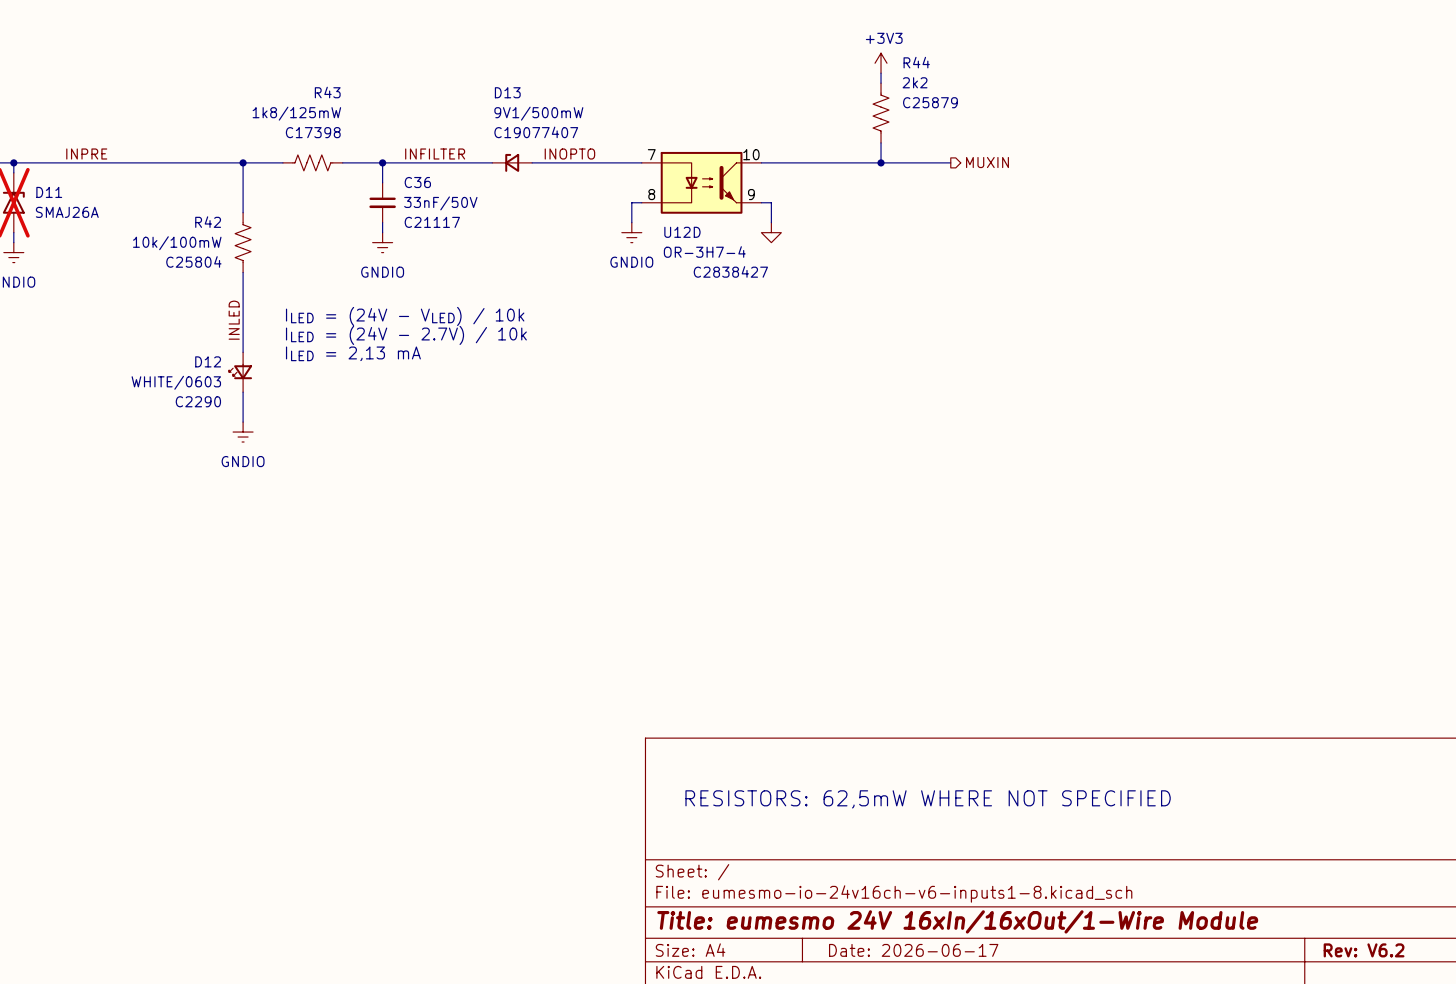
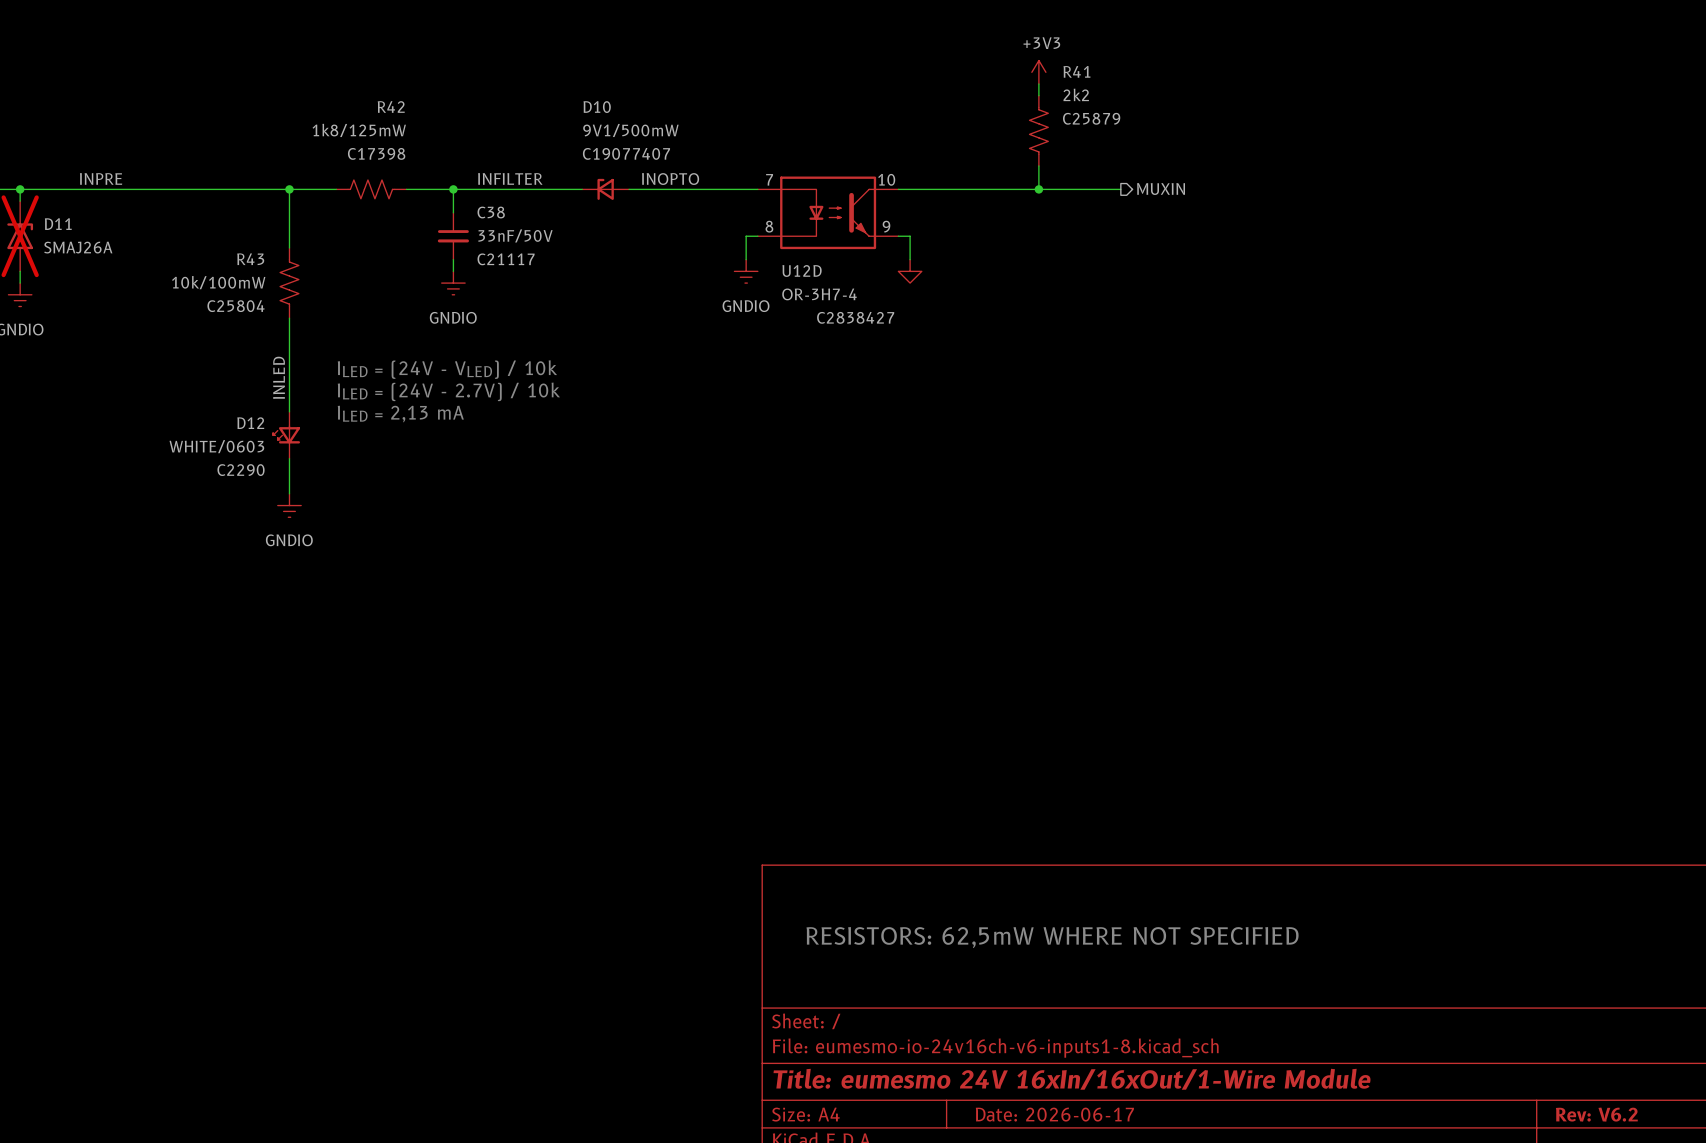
R44 name: R44 (916, 62) -> R41 (1076, 71)
R43 name: R43 (327, 92) -> R42 (391, 106)
D13 name: D13 (507, 92) -> D10 (597, 107)
C36 name: C36 (417, 182) -> C38 (491, 212)
R42 name: R42 (208, 222) -> R43 (250, 259)

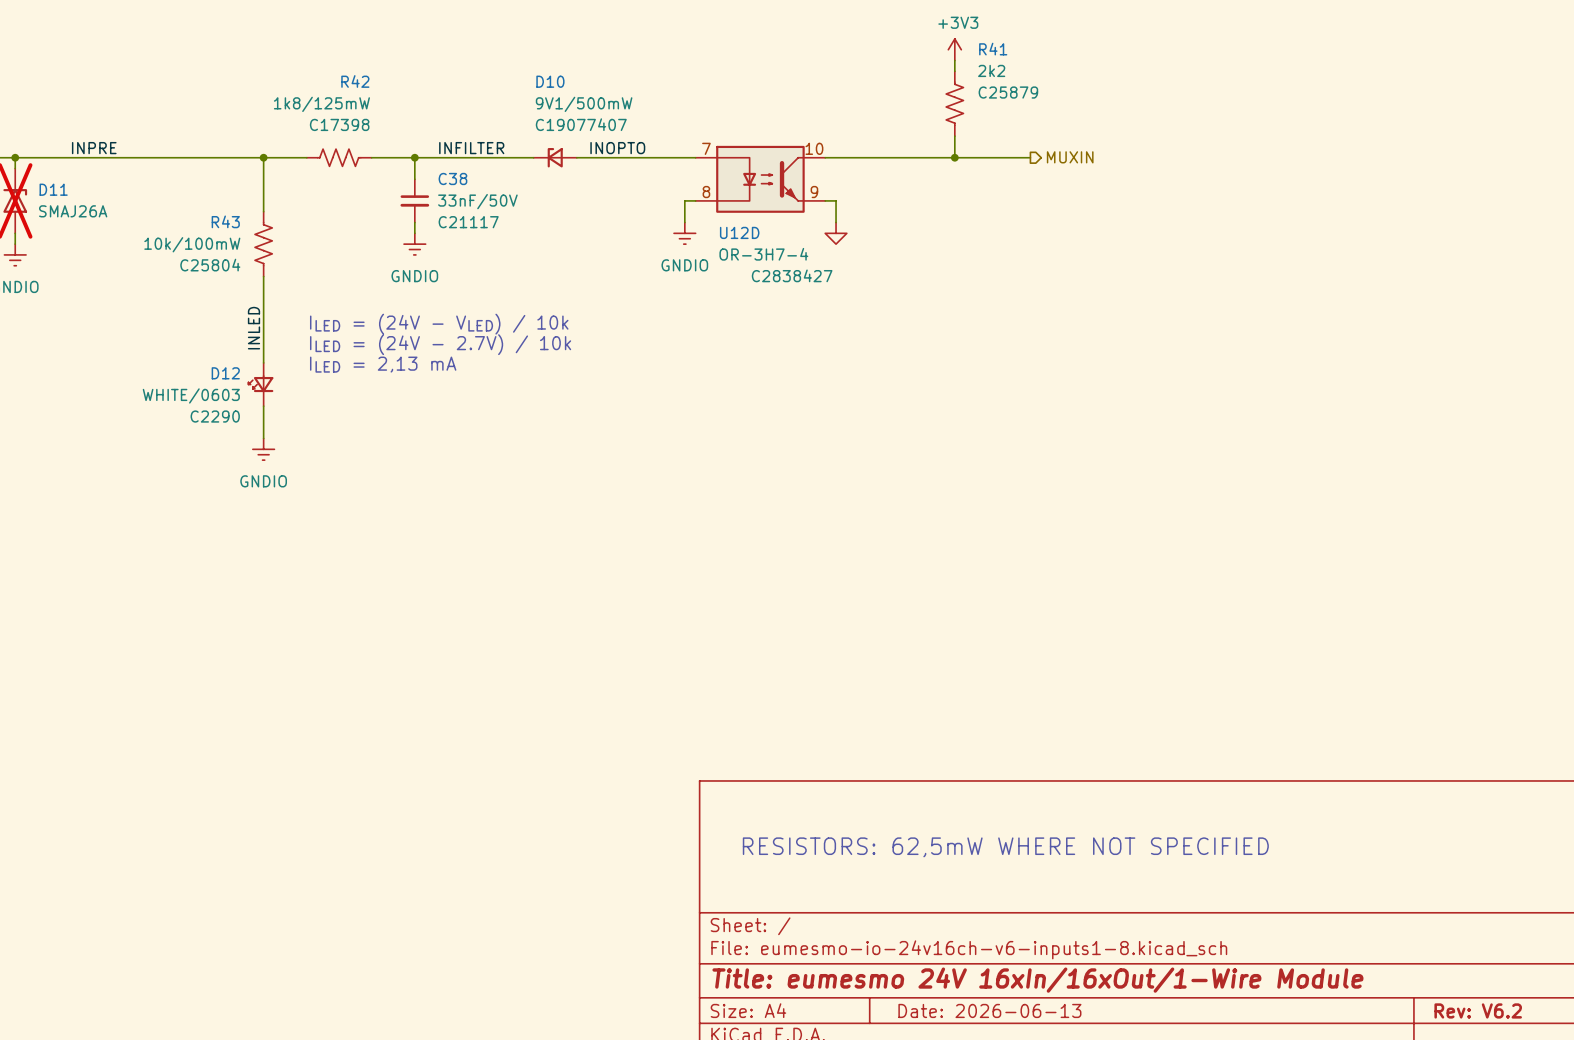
title block: Date: 2026-06-17 (1054, 1114) -> Date: 2026-06-13 (989, 1010)

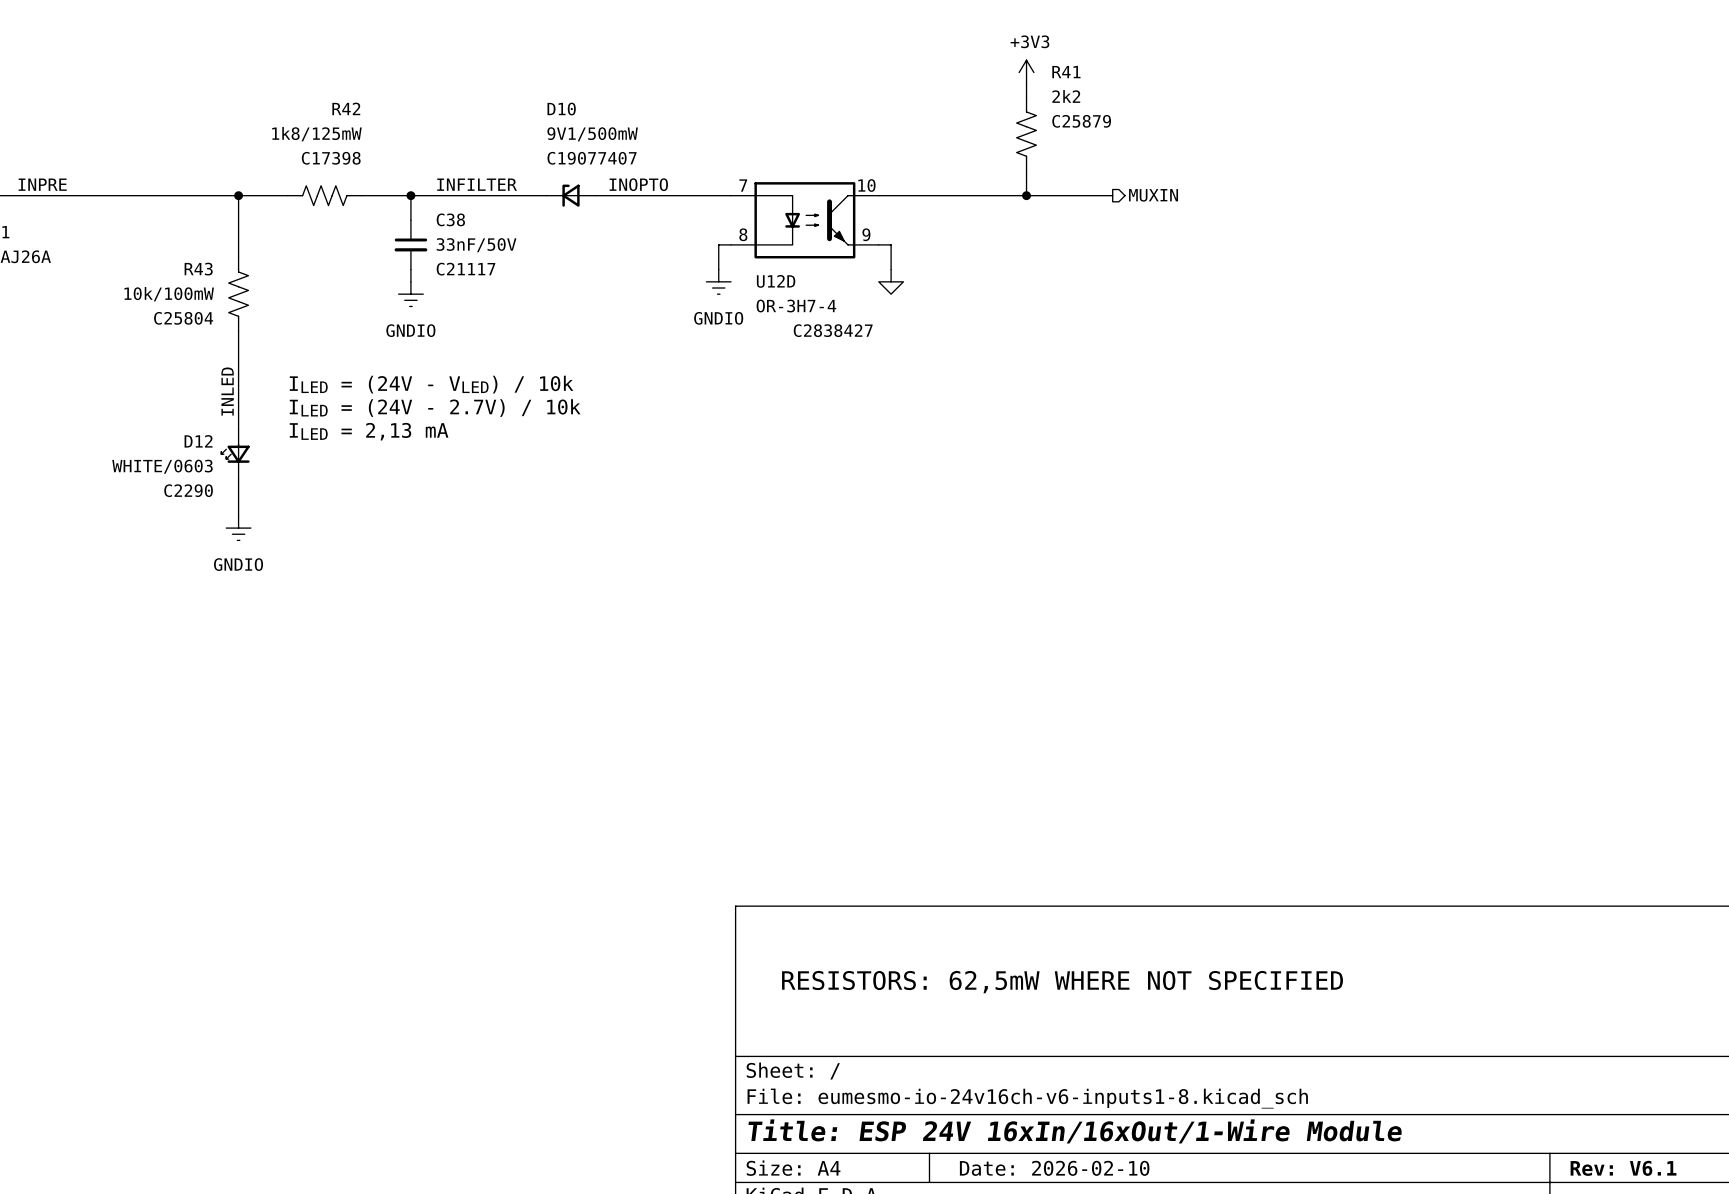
title block: Title: eumesmo 24V 16xIn/16xOut/1-Wire Module (1037, 980) -> Title: ESP 24V 16xIn/16xOut/1-Wire Module (1075, 1131)
title block: Date: 2026-06-13 (989, 1010) -> Date: 2026-02-10 (1054, 1168)
title block: Rev: V6.2 (1478, 1010) -> Rev: V6.1 (1623, 1168)

